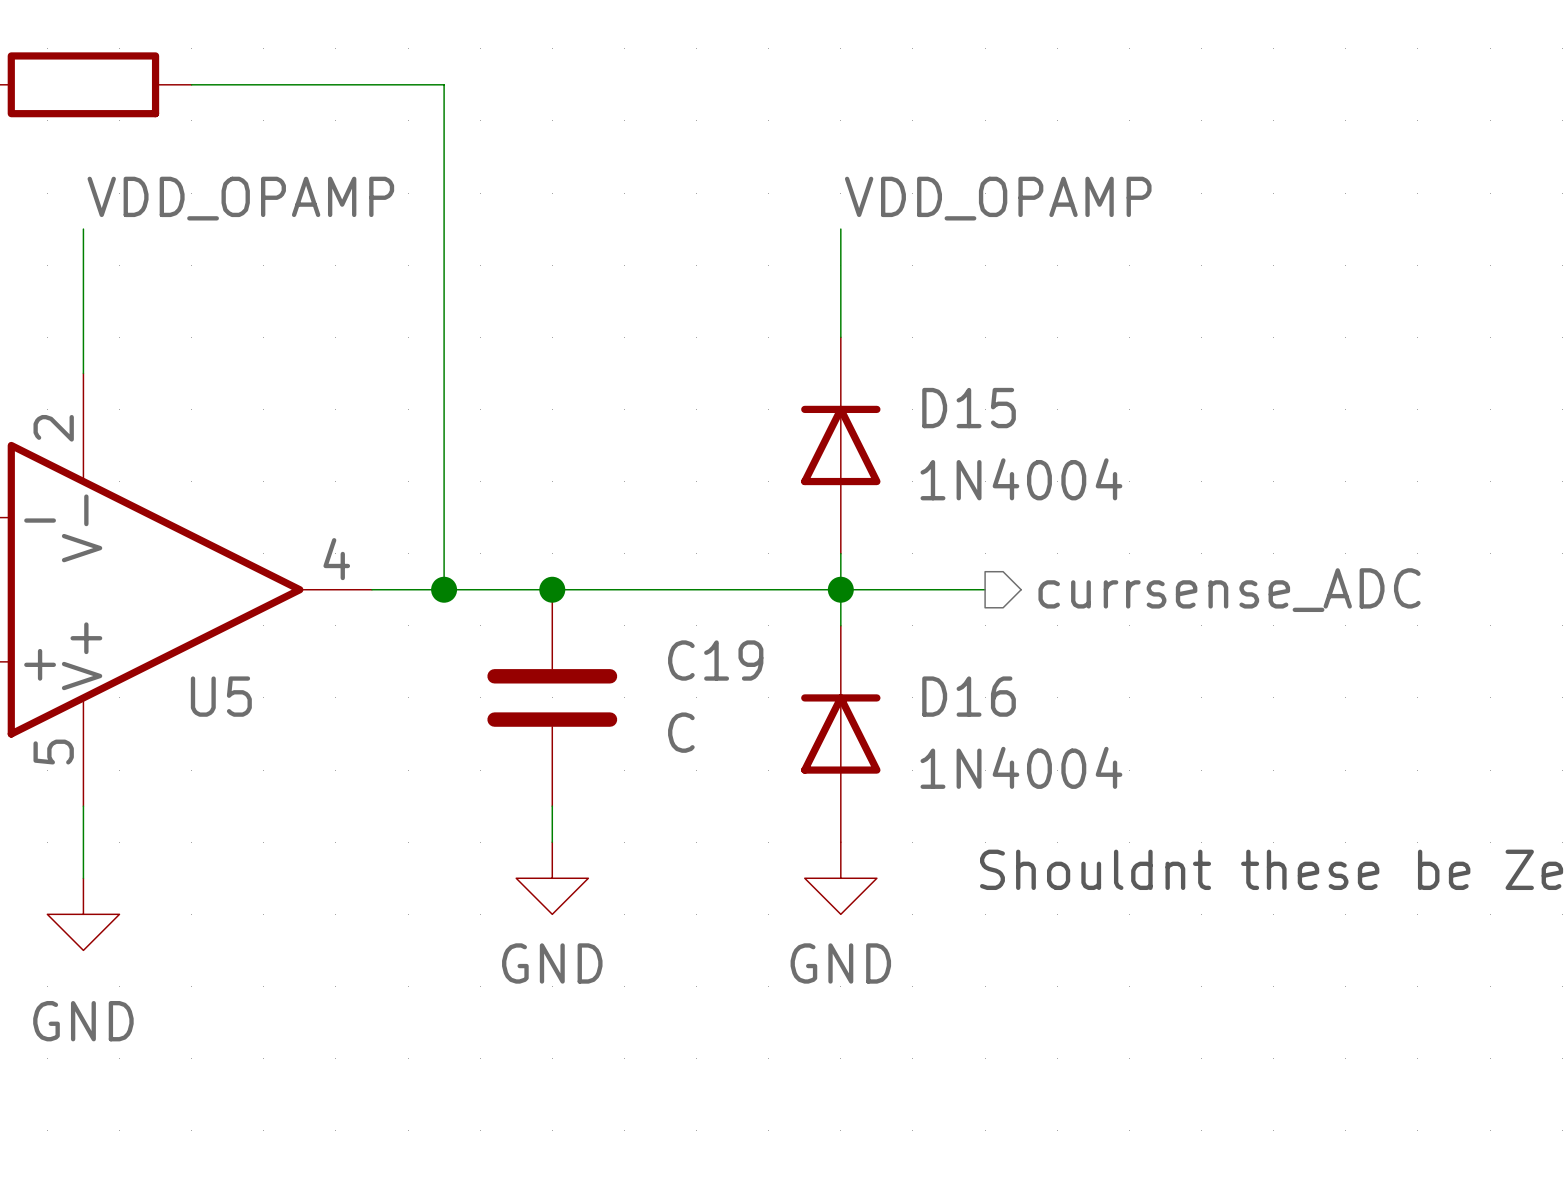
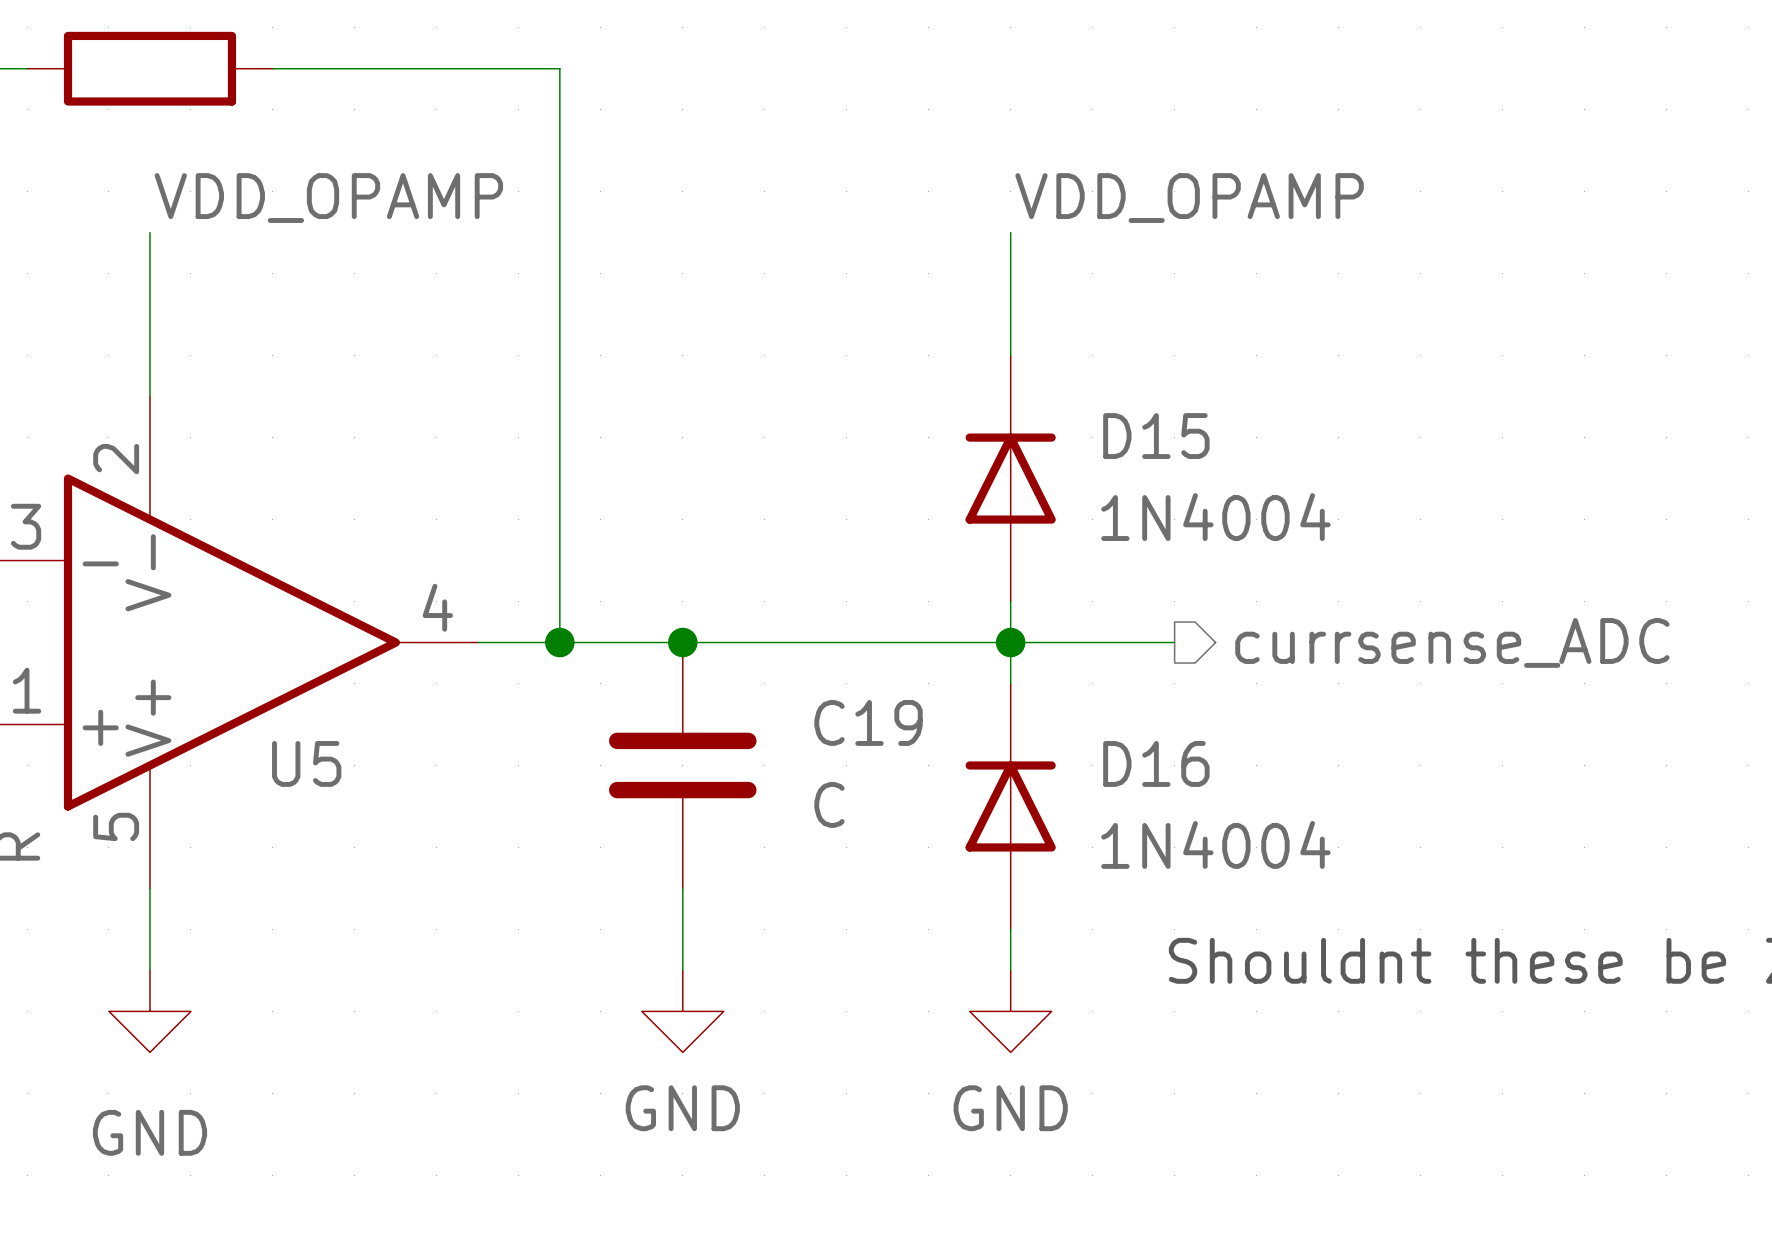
power symbol position: GND (552, 878) -> GND (682, 1011)
power symbol position: GND (840, 878) -> GND (1010, 1011)

